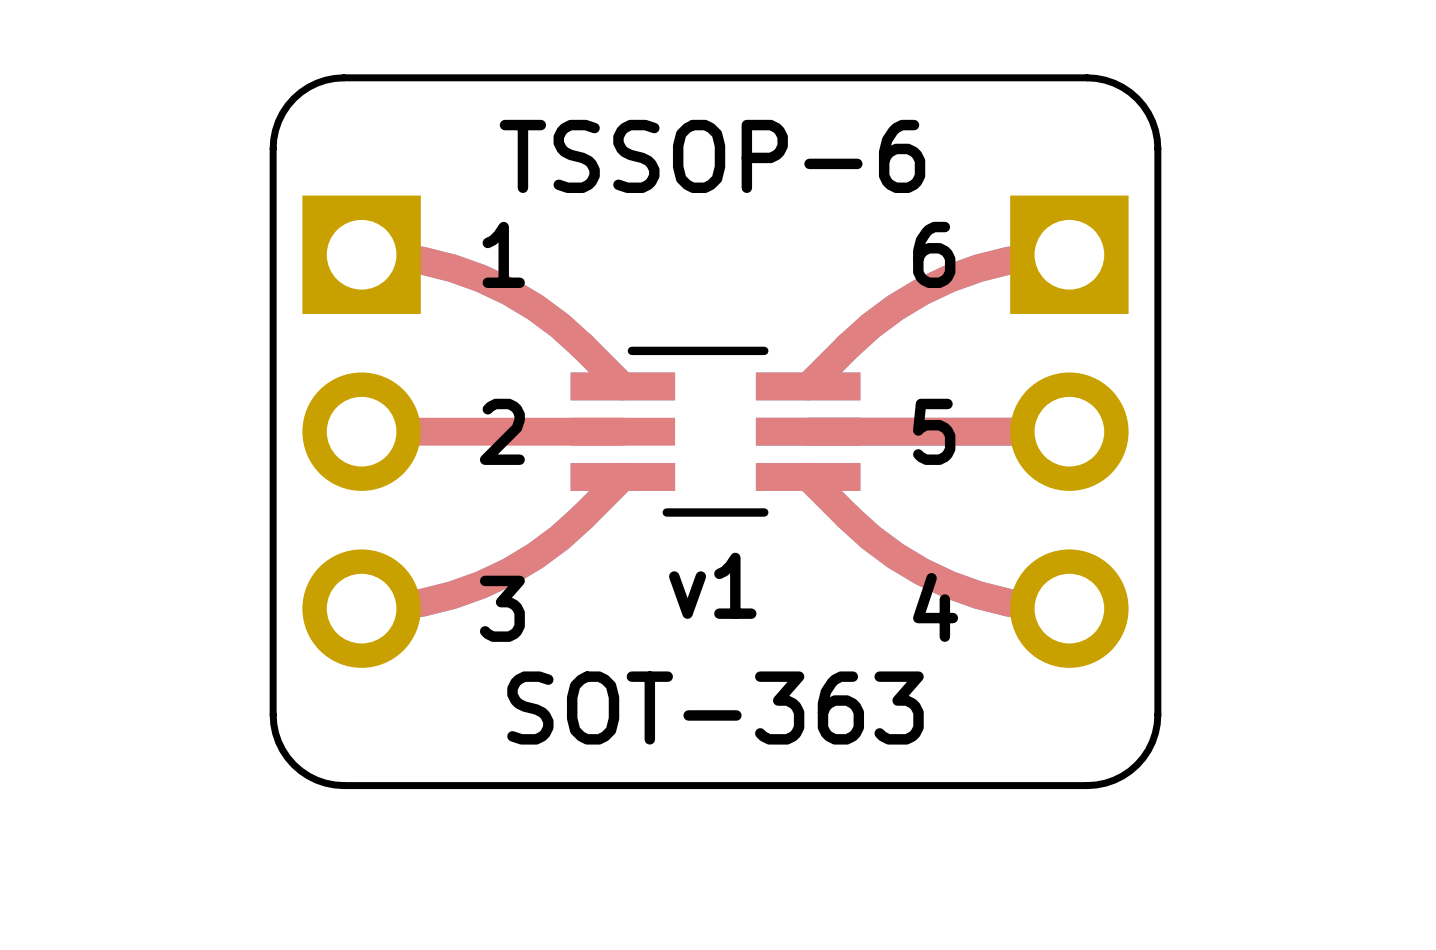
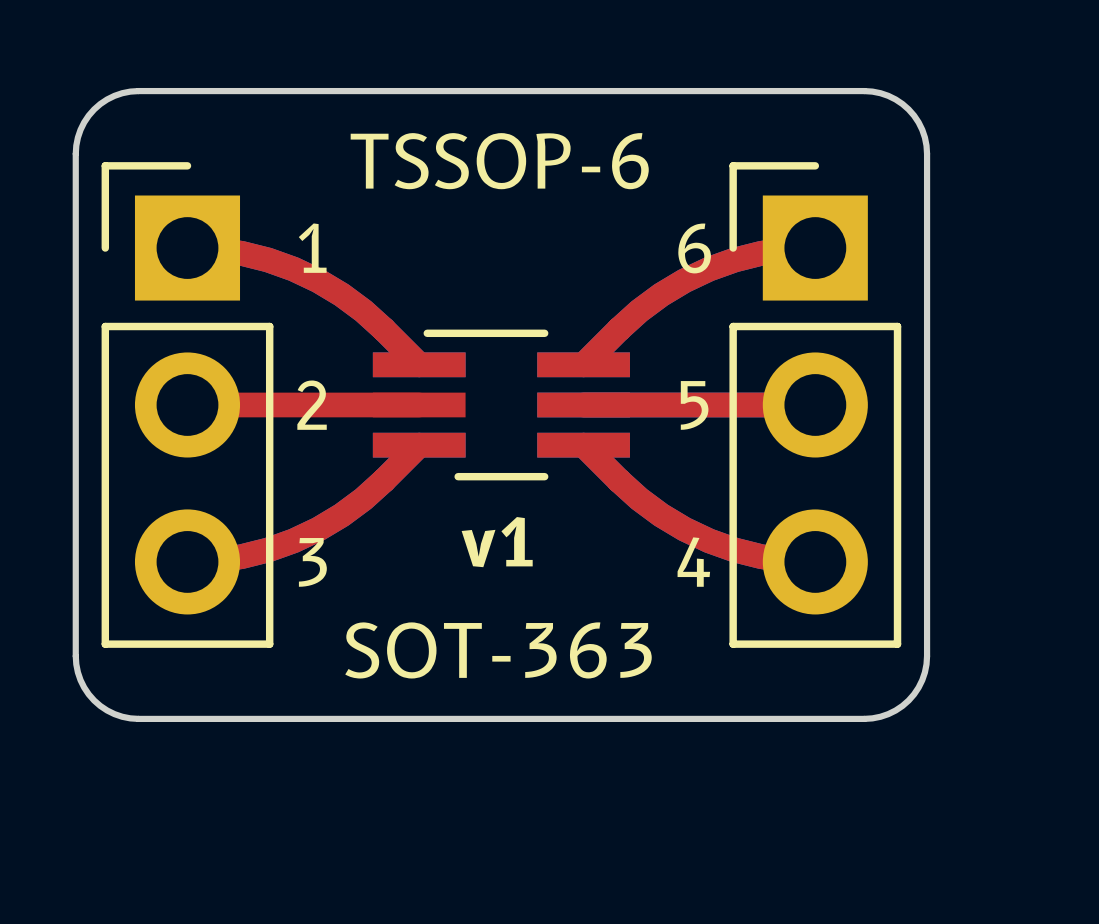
board edge: (343, 77) (316, 83) (293, 98) (278, 121) (273, 148) (273, 724) (282, 750) (300, 770) (325, 783) (343, 785) -> (171, 91) (130, 91) (107, 99) (94, 109) (84, 122) (77, 137) (75, 153) (76, 664) (84, 687) (94, 700) (107, 710) (130, 718) (171, 718)
board edge: (1087, 77) (1114, 83) (1137, 98) (1152, 121) (1157, 148) (1157, 724) (1148, 750) (1130, 770) (1105, 783) (1087, 785) -> (831, 91) (872, 91) (895, 99) (908, 109) (918, 122) (924, 137) (927, 153) (926, 664) (922, 680) (914, 694) (895, 710) (872, 718) (831, 718)
part footprint: [302, 195, 421, 668] -> [101, 162, 274, 648]
part footprint: [1010, 195, 1129, 668] -> [729, 162, 902, 648]

